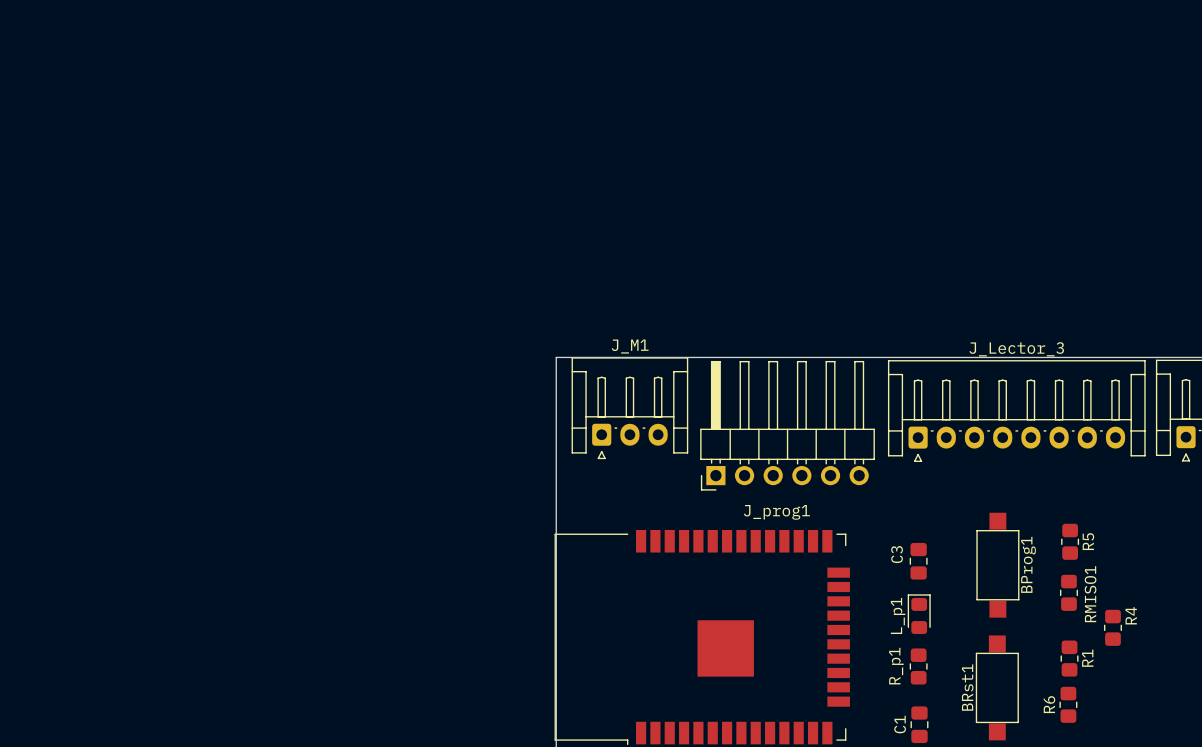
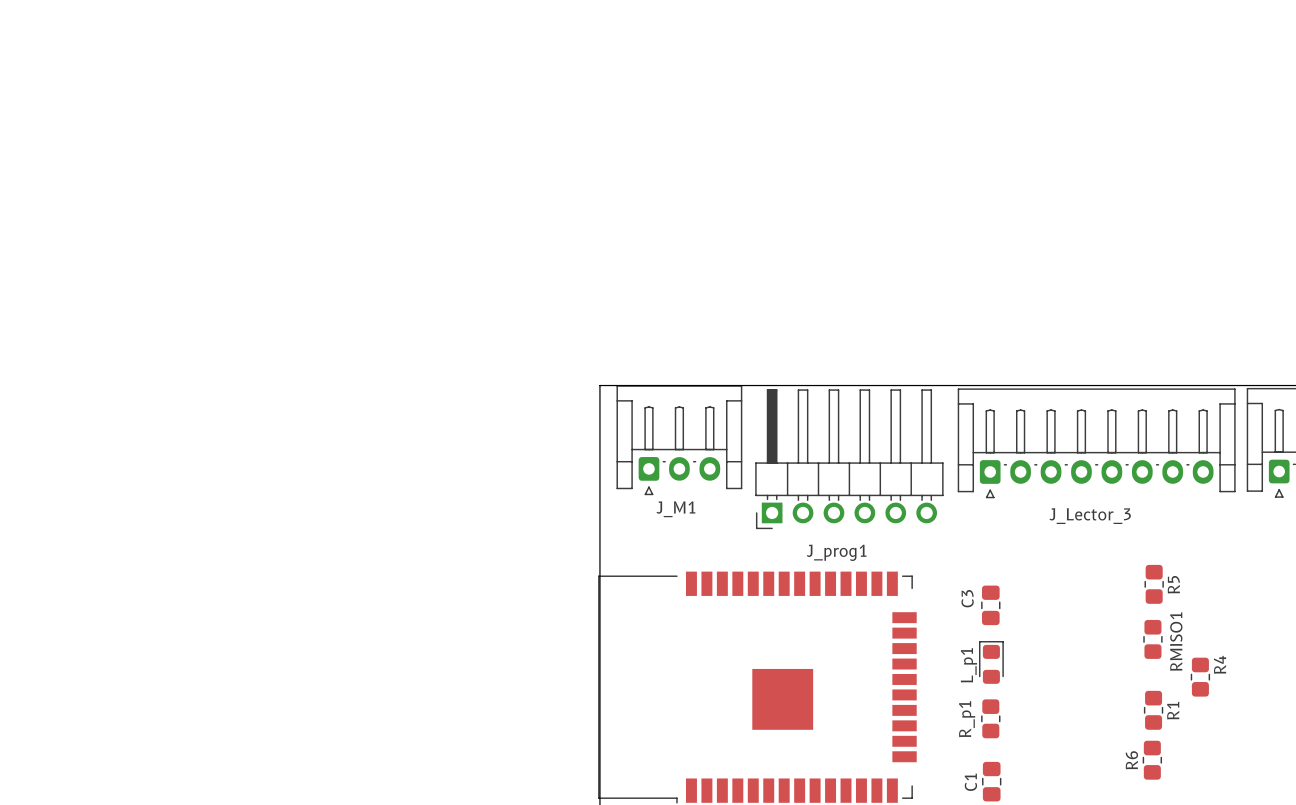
J_M1 name position: J_M1 (630, 346) -> J_M1 (675, 509)
J_Lector_3 name position: J_Lector_3 (1016, 349) -> J_Lector_3 (1090, 516)
BProg1: (997, 565) -> none
BRst1: (997, 687) -> none

